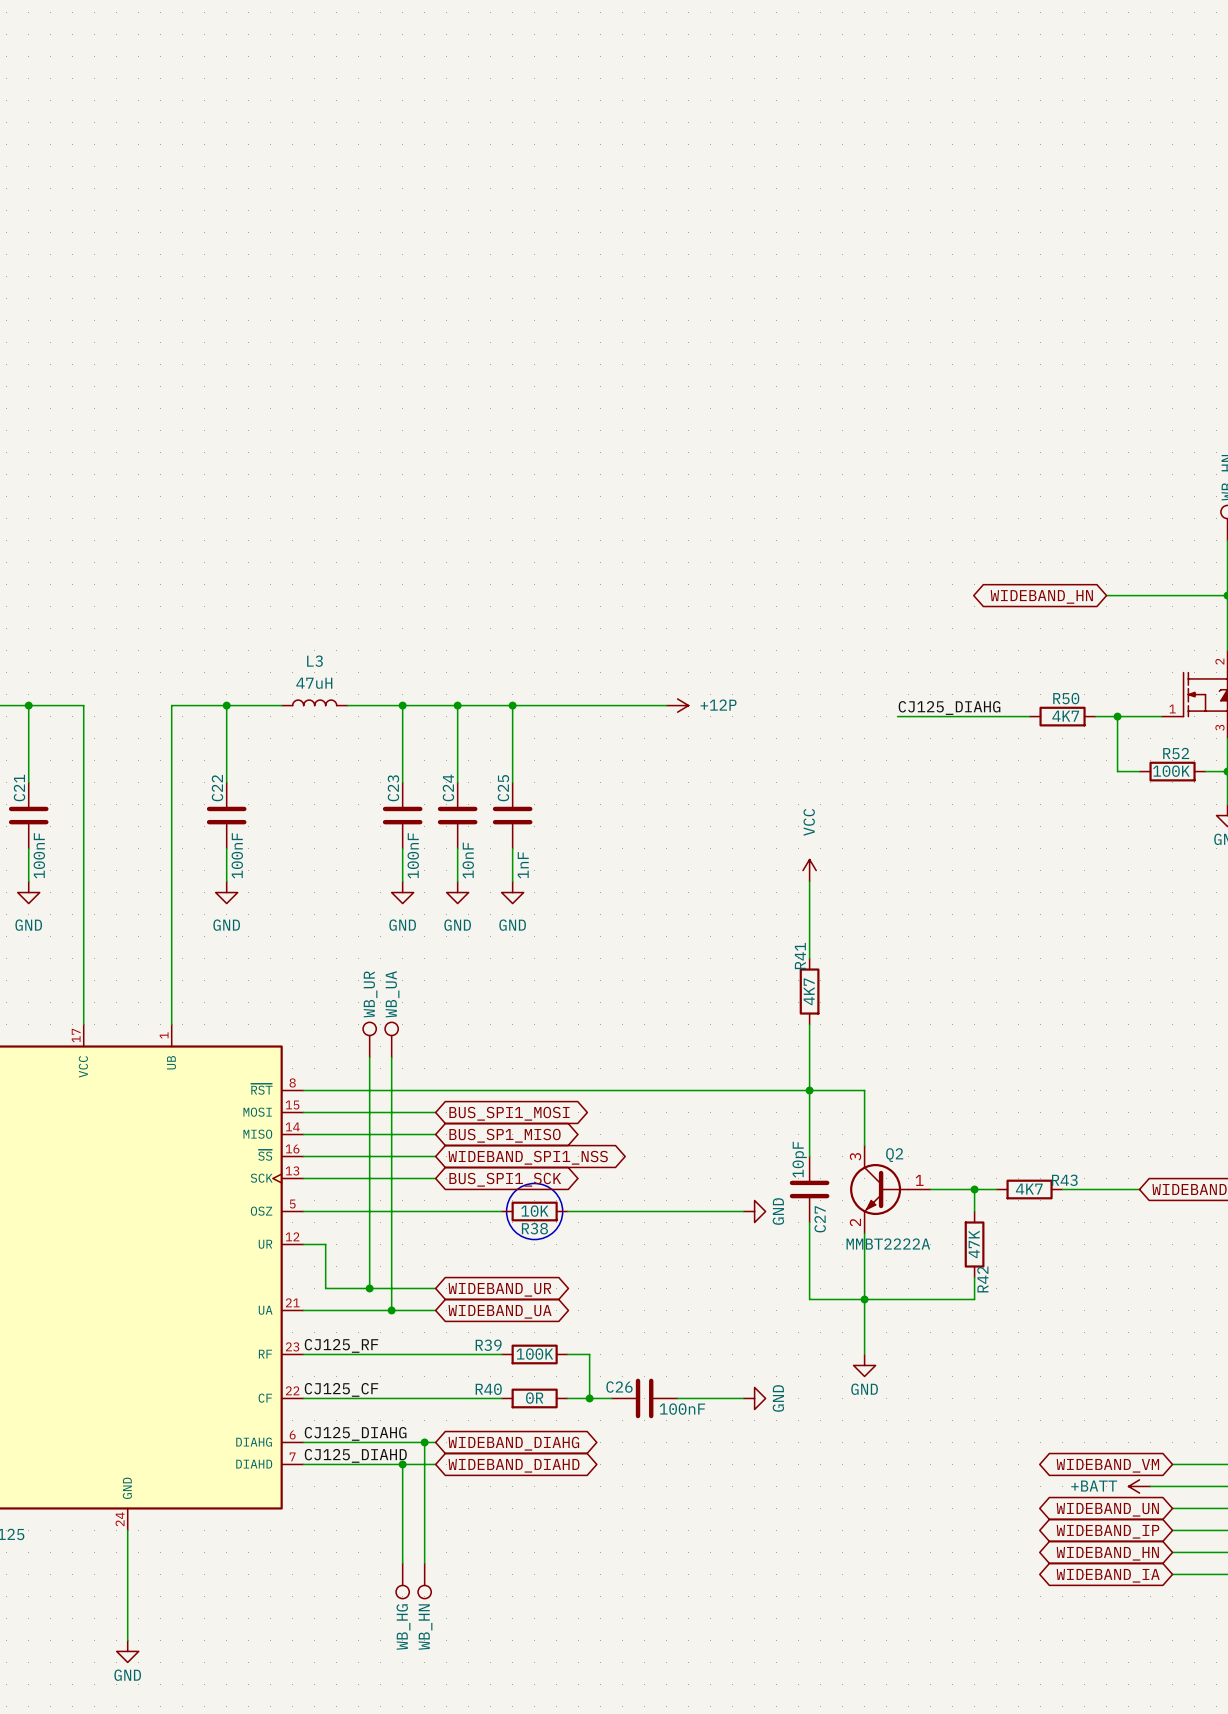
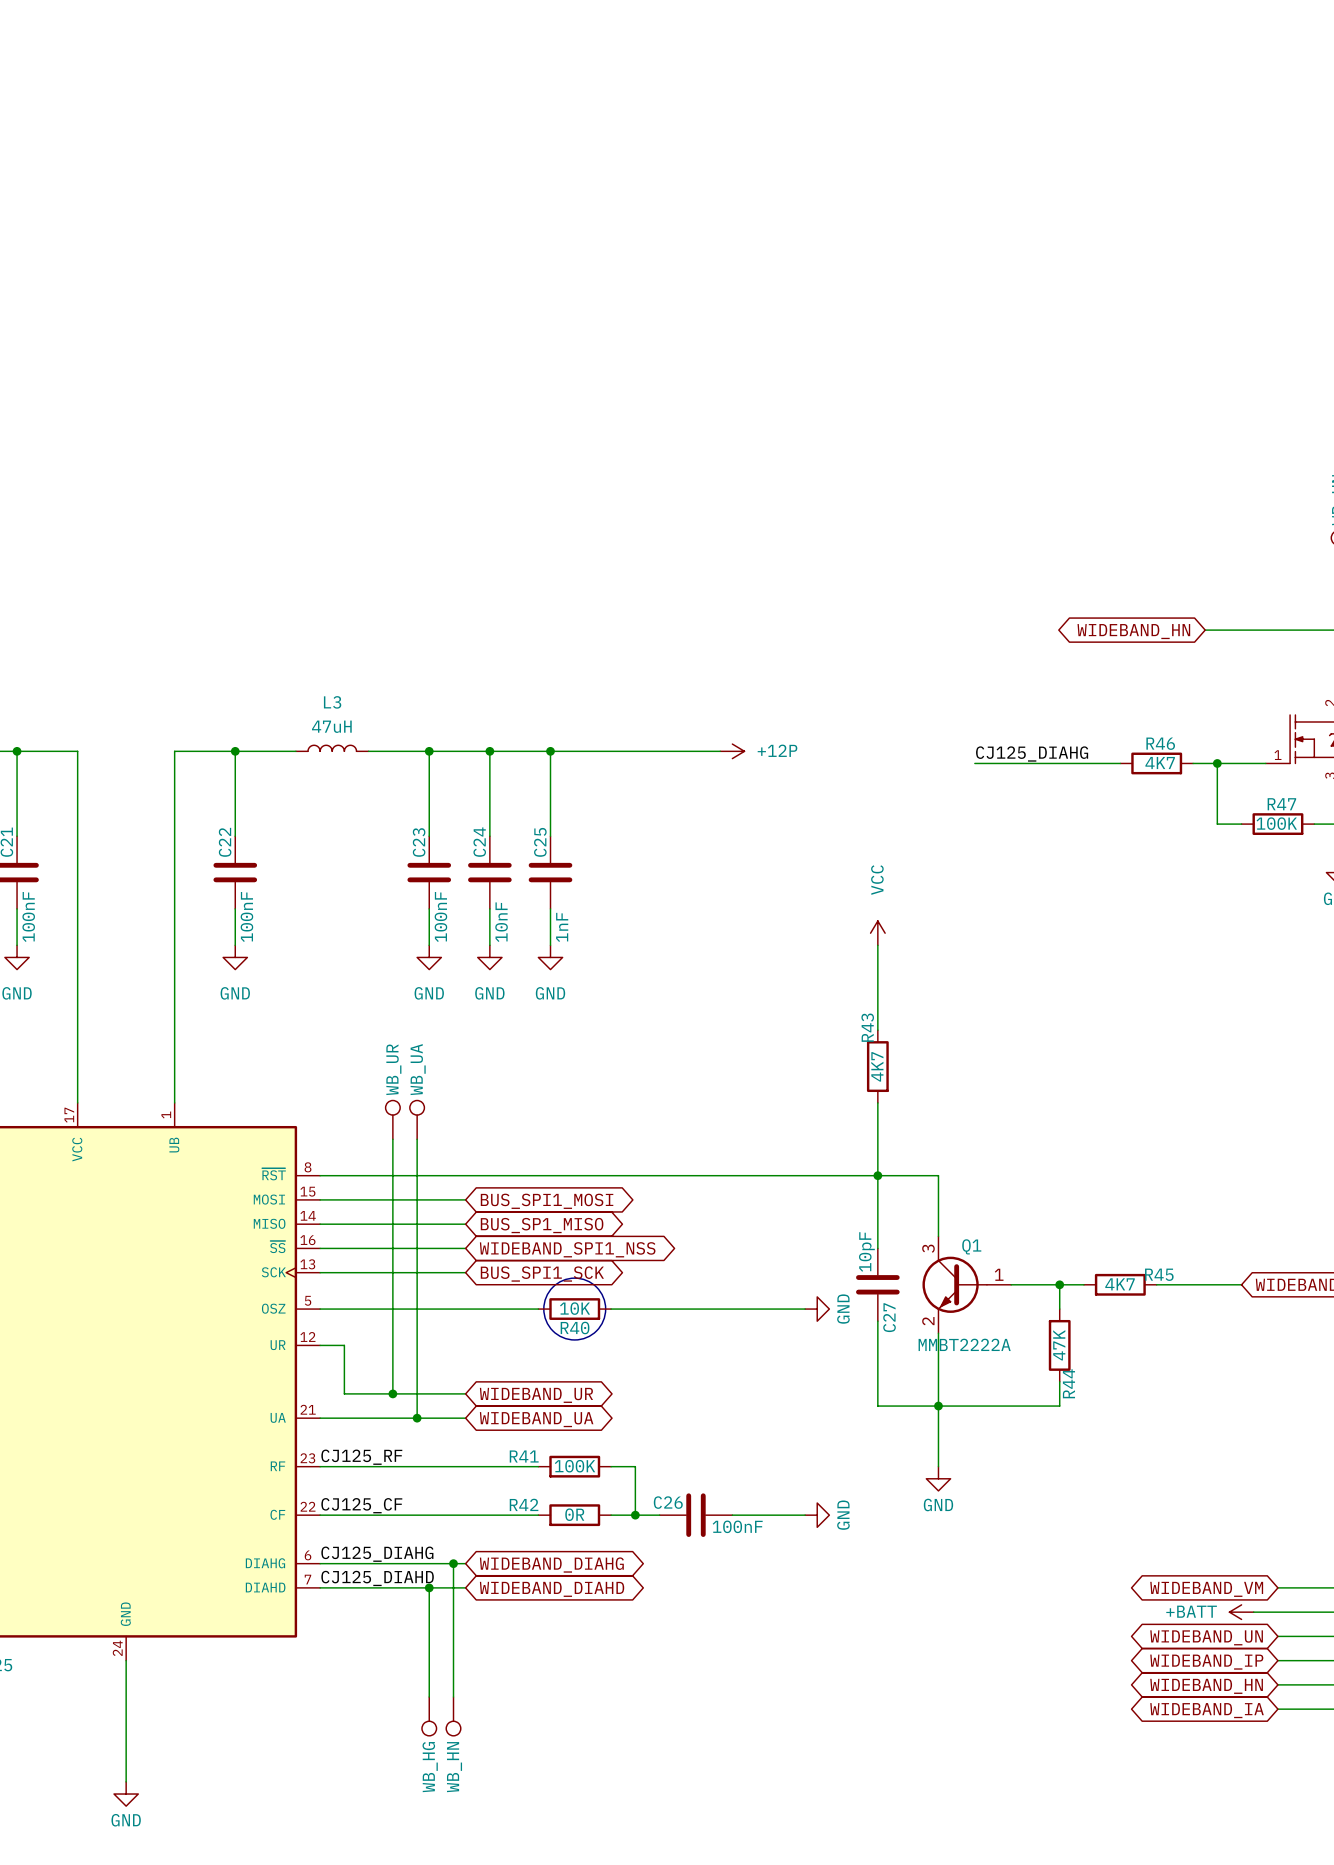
R50 name: R50 (1066, 698) -> R46 (1160, 743)
R52 name: R52 (1176, 753) -> R47 (1281, 804)
R41 name: R41 (800, 956) -> R43 (867, 1027)
Q2 name: Q2 (894, 1155) -> Q1 (971, 1246)
R43 name: R43 (1064, 1180) -> R45 (1159, 1274)
R38 name: R38 (534, 1228) -> R40 (575, 1327)
R42 name: R42 (982, 1279) -> R44 (1068, 1383)
R39 name: R39 (488, 1345) -> R41 (524, 1456)
R40 name: R40 (488, 1389) -> R42 (524, 1504)

